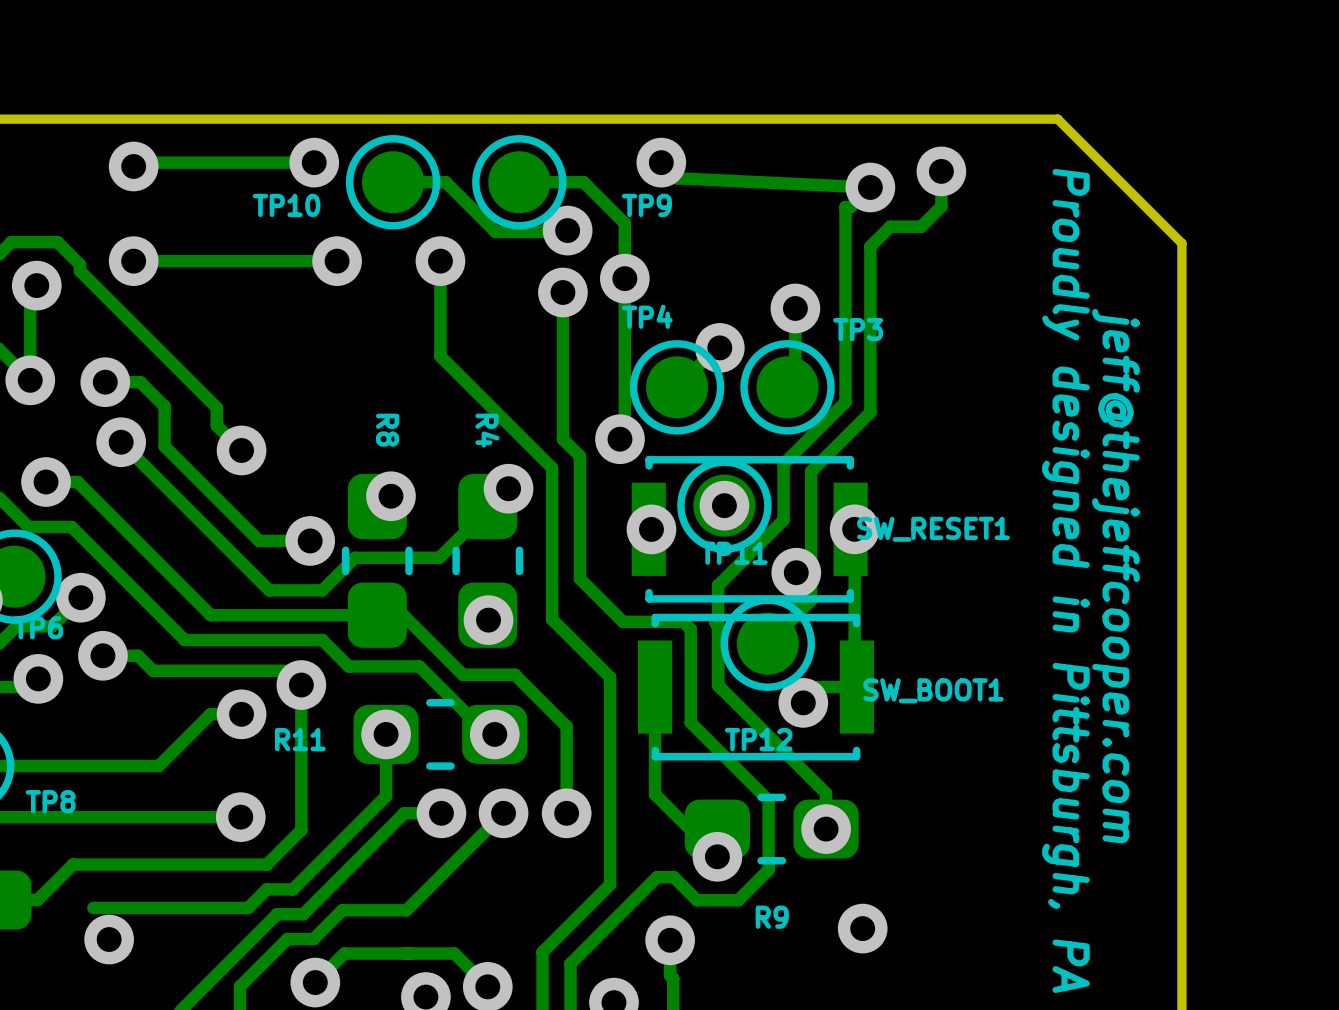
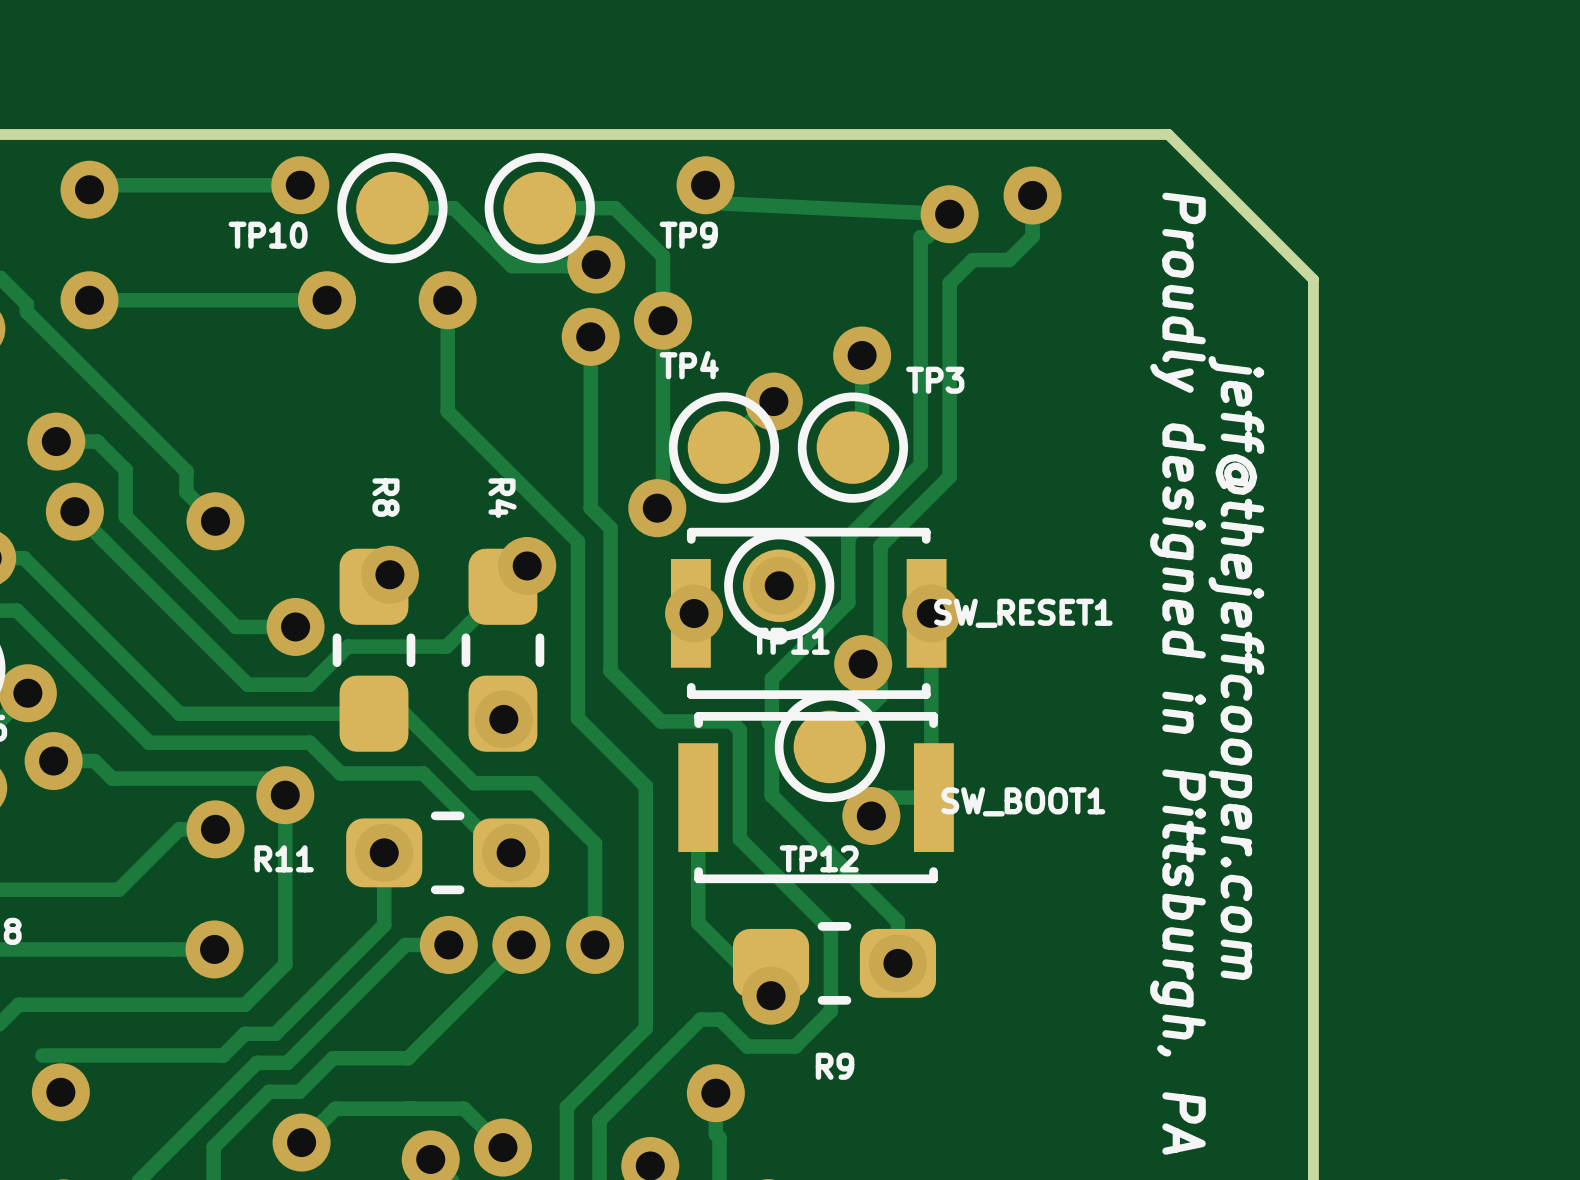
via: (862, 928) -> none

